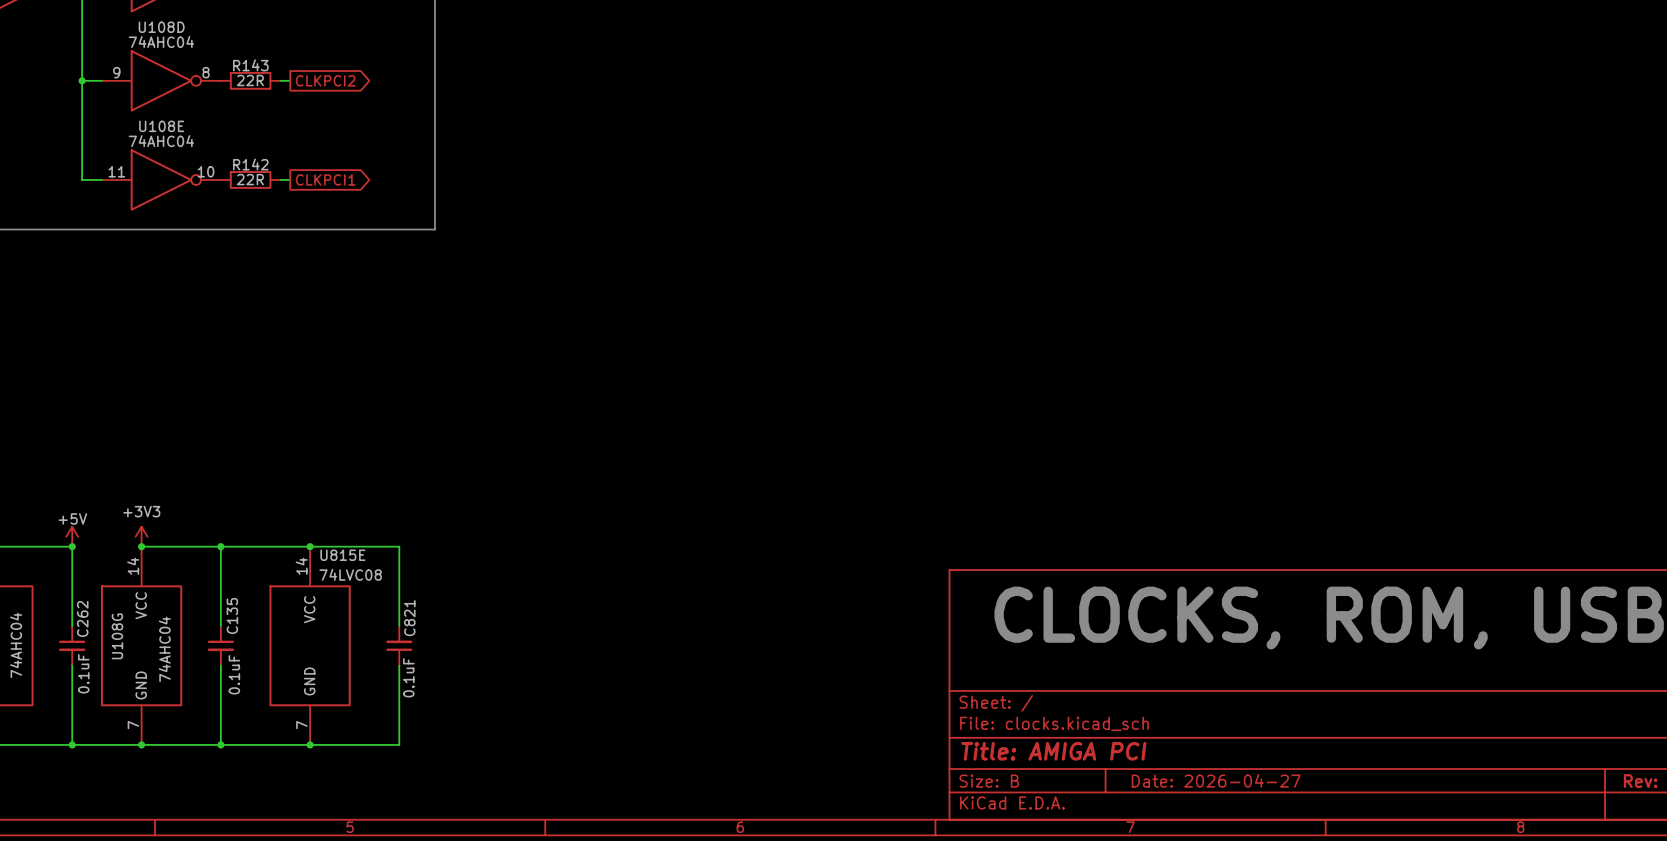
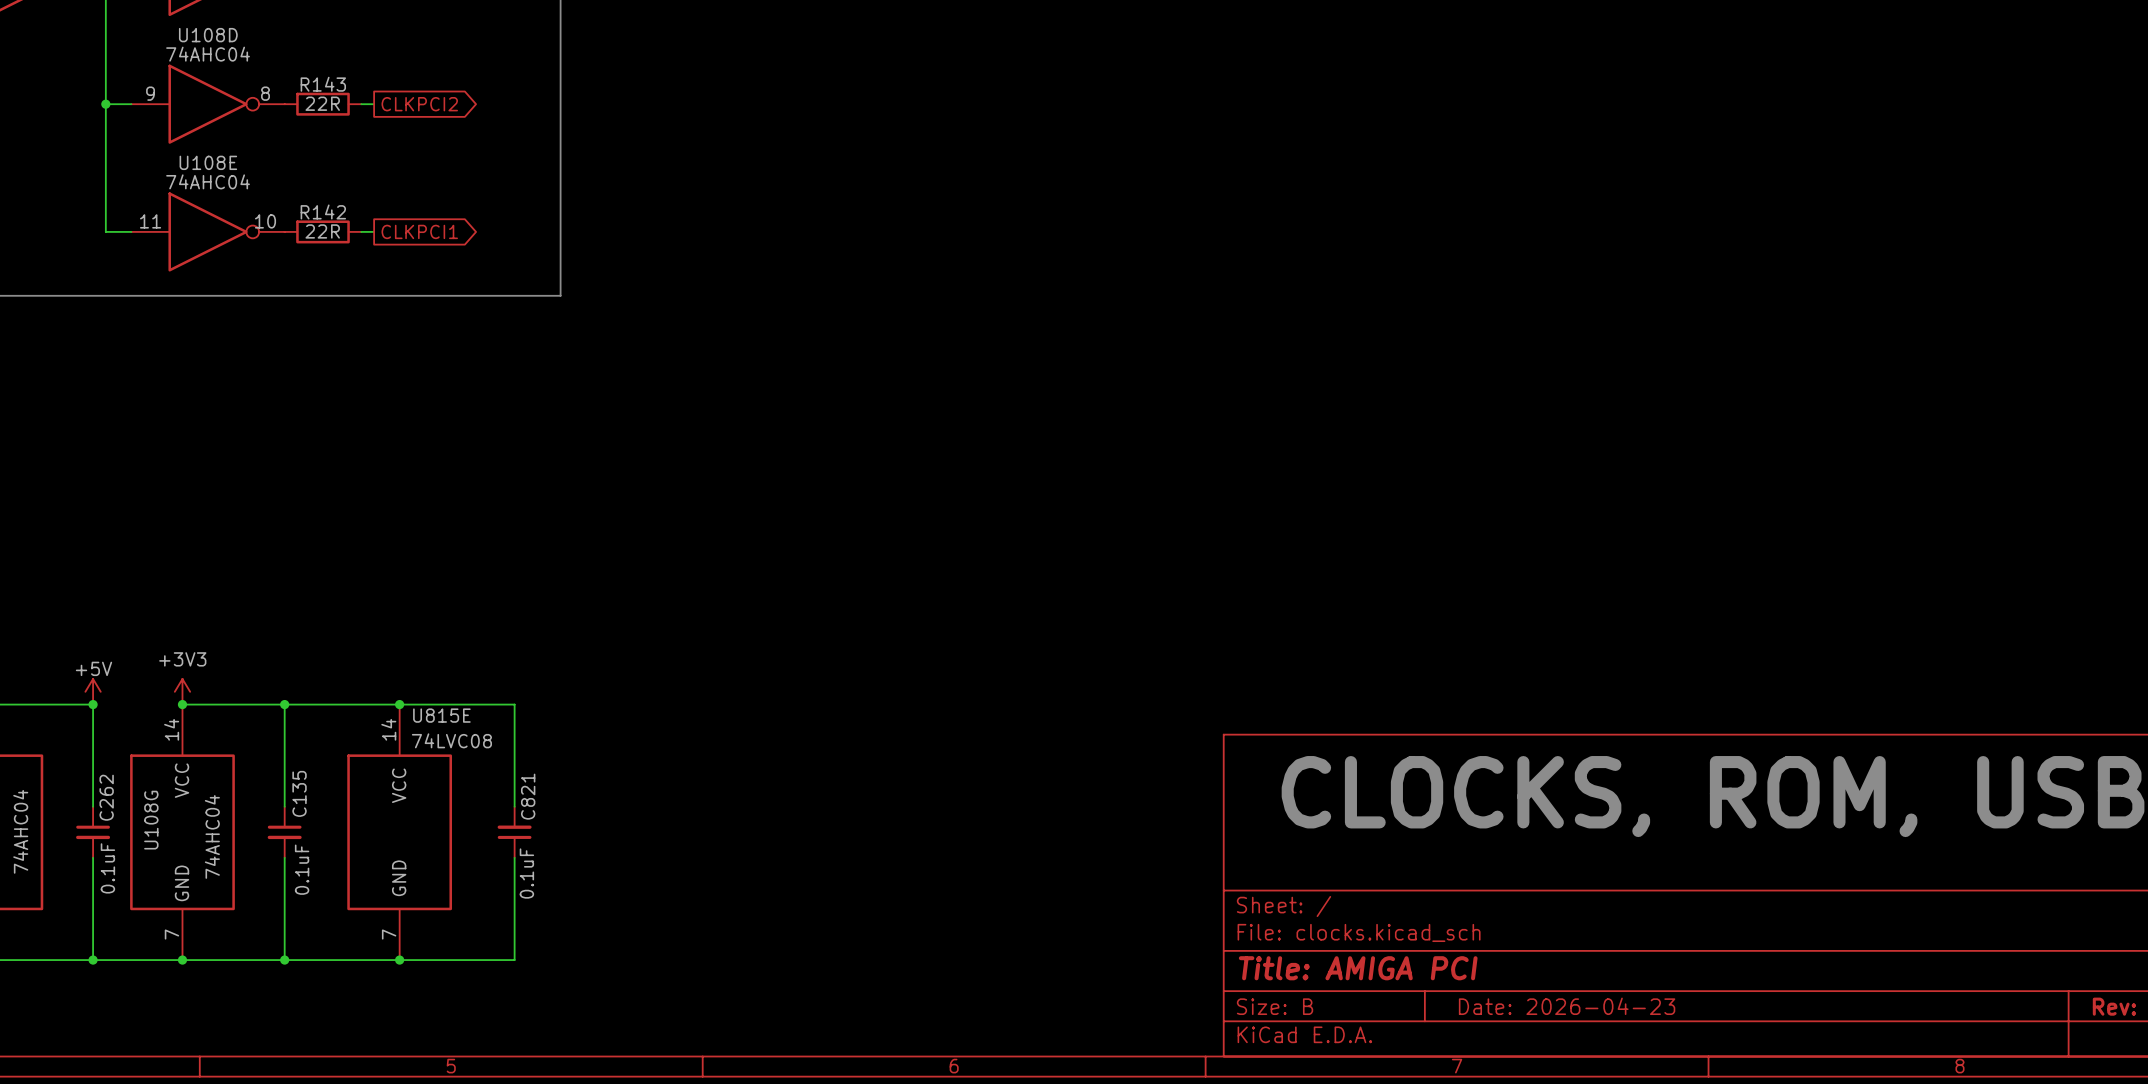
title block: Date: 2026-04-27 (1216, 780) -> Date: 2026-04-23 (1567, 1006)

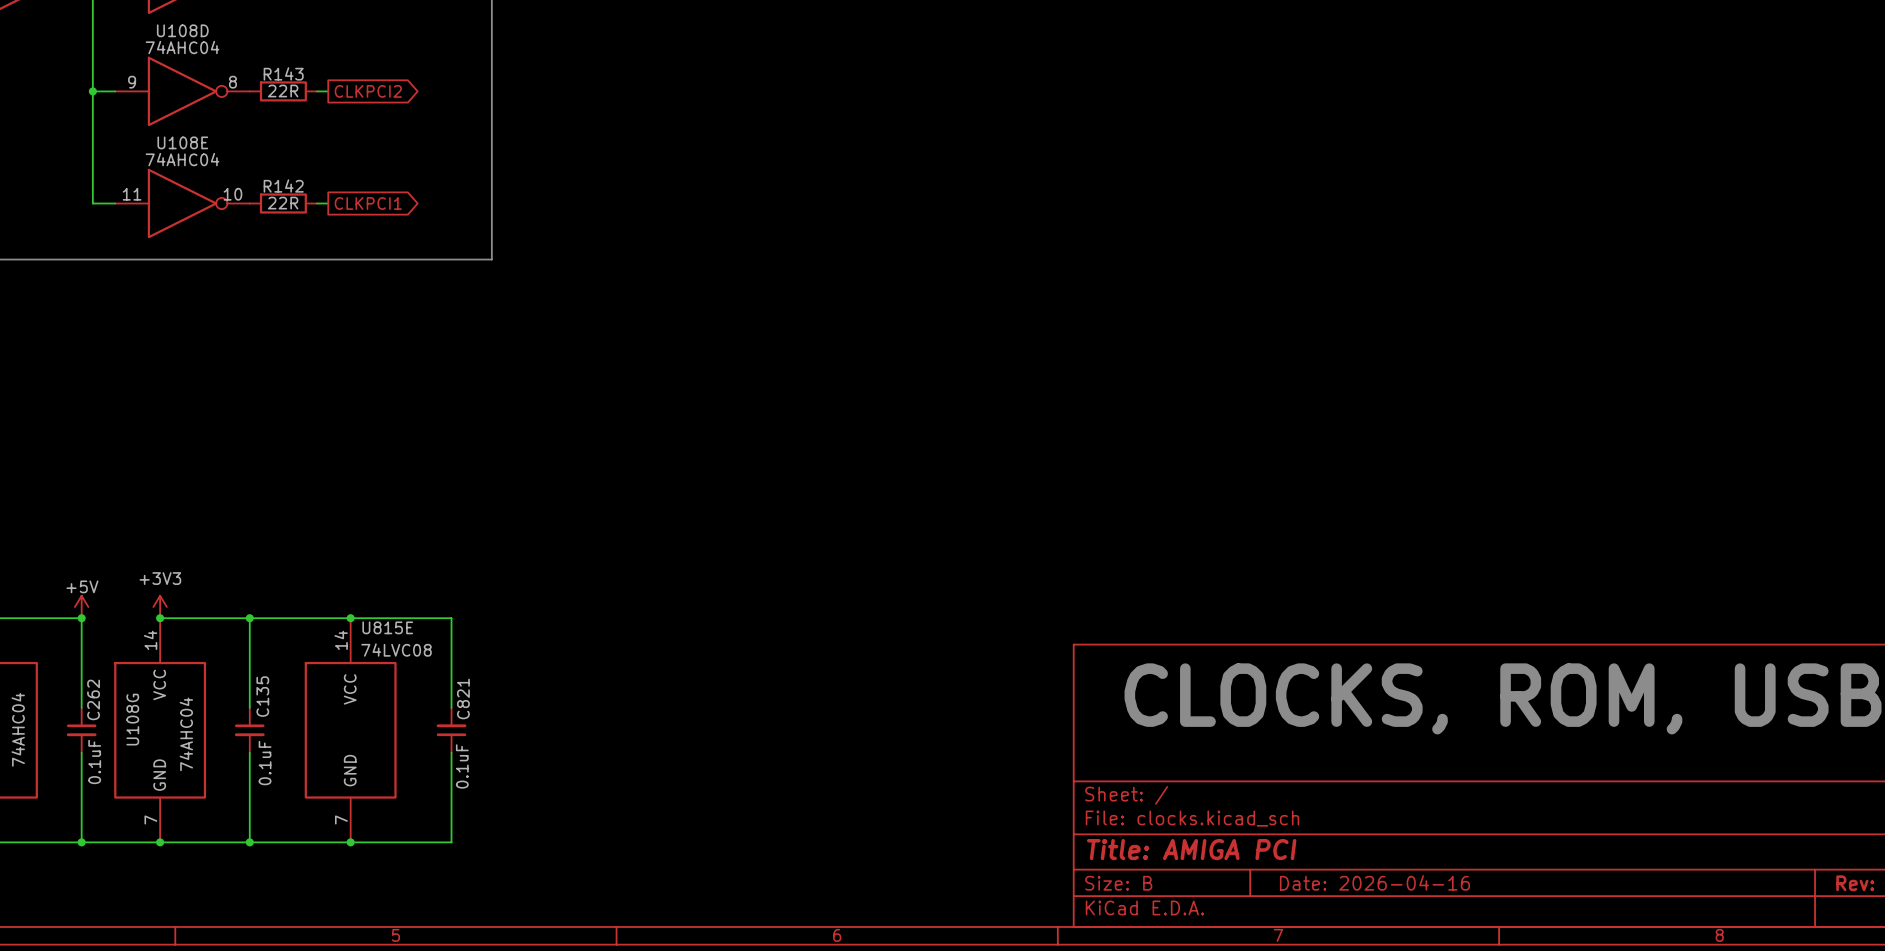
title block: Date: 2026-04-23 (1567, 1006) -> Date: 2026-04-16 (1374, 882)

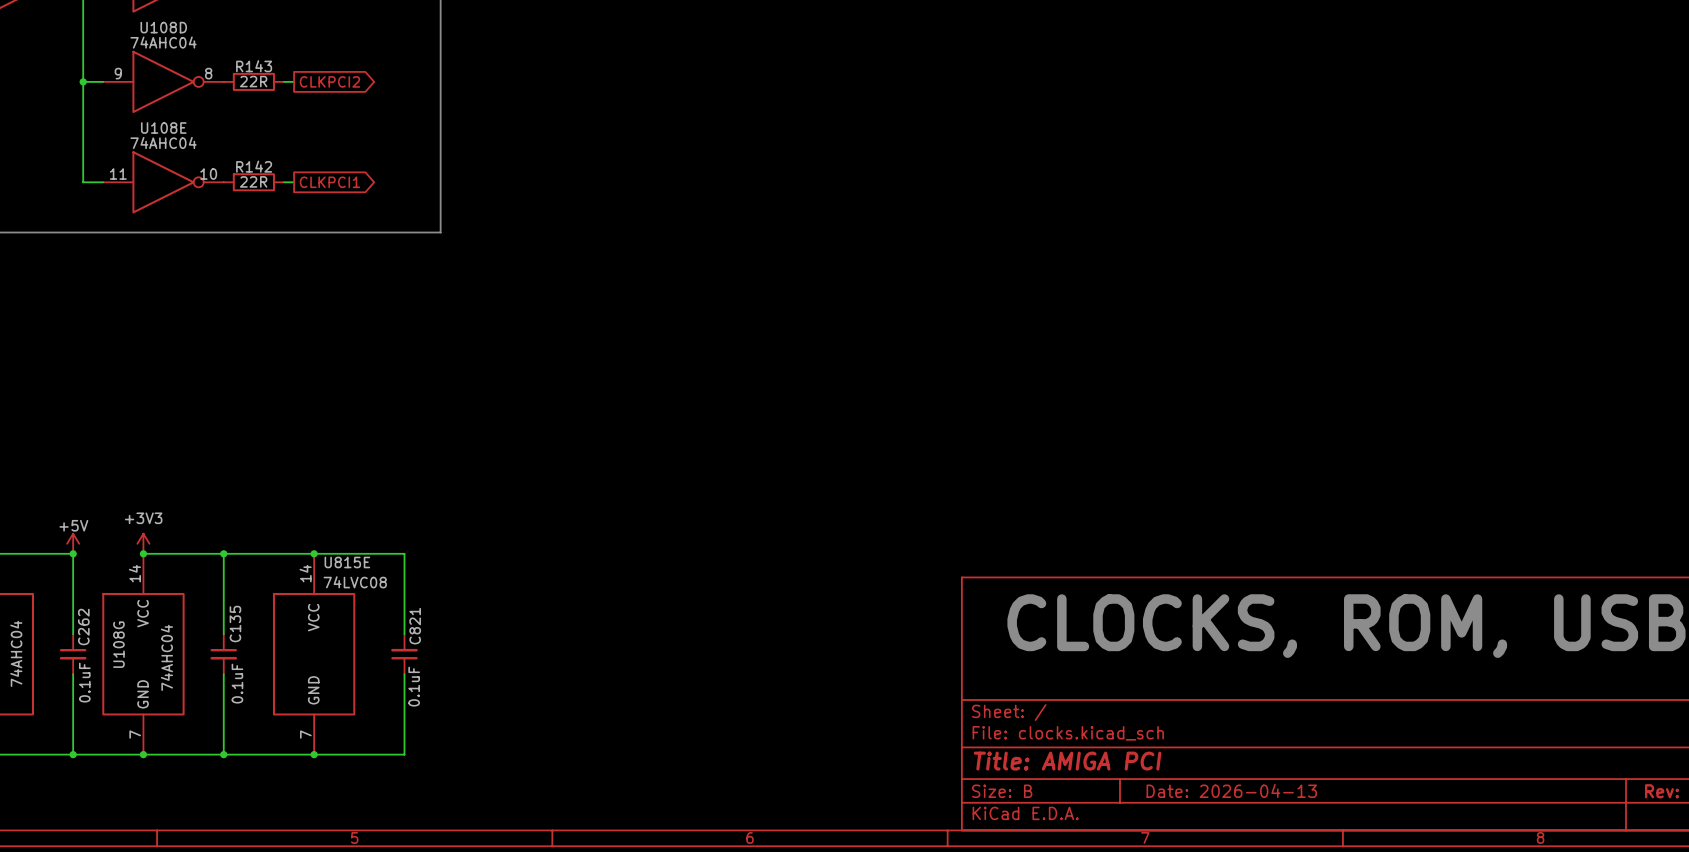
title block: Date: 2026-04-16 (1374, 882) -> Date: 2026-04-13 (1231, 790)

